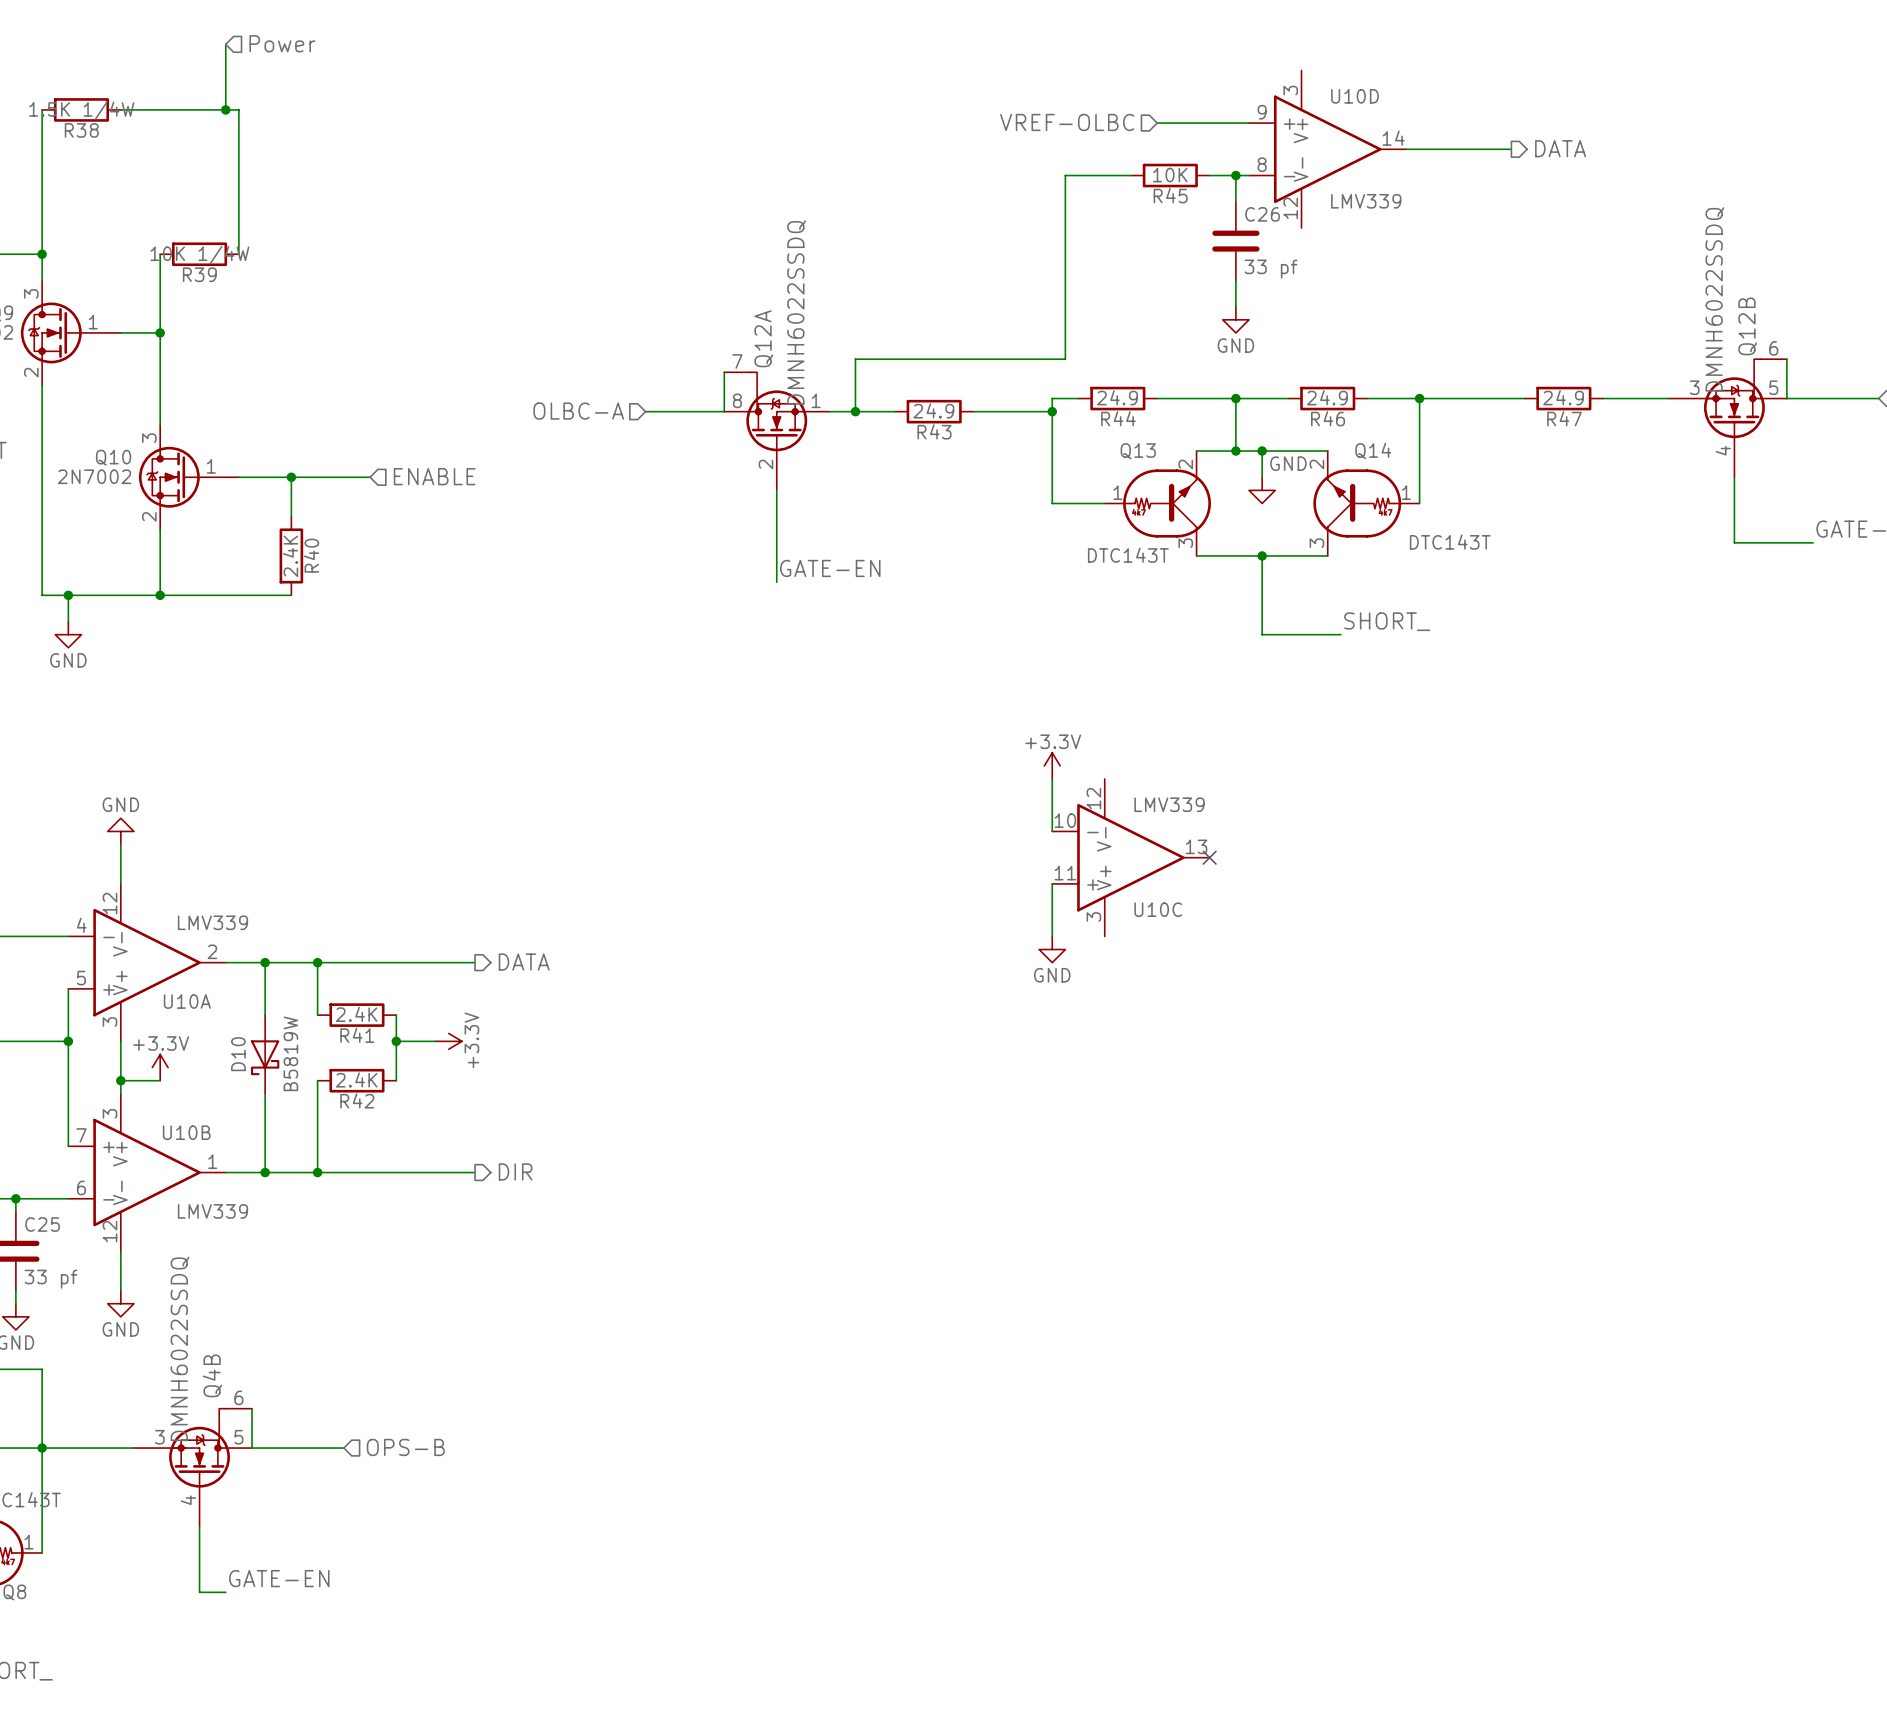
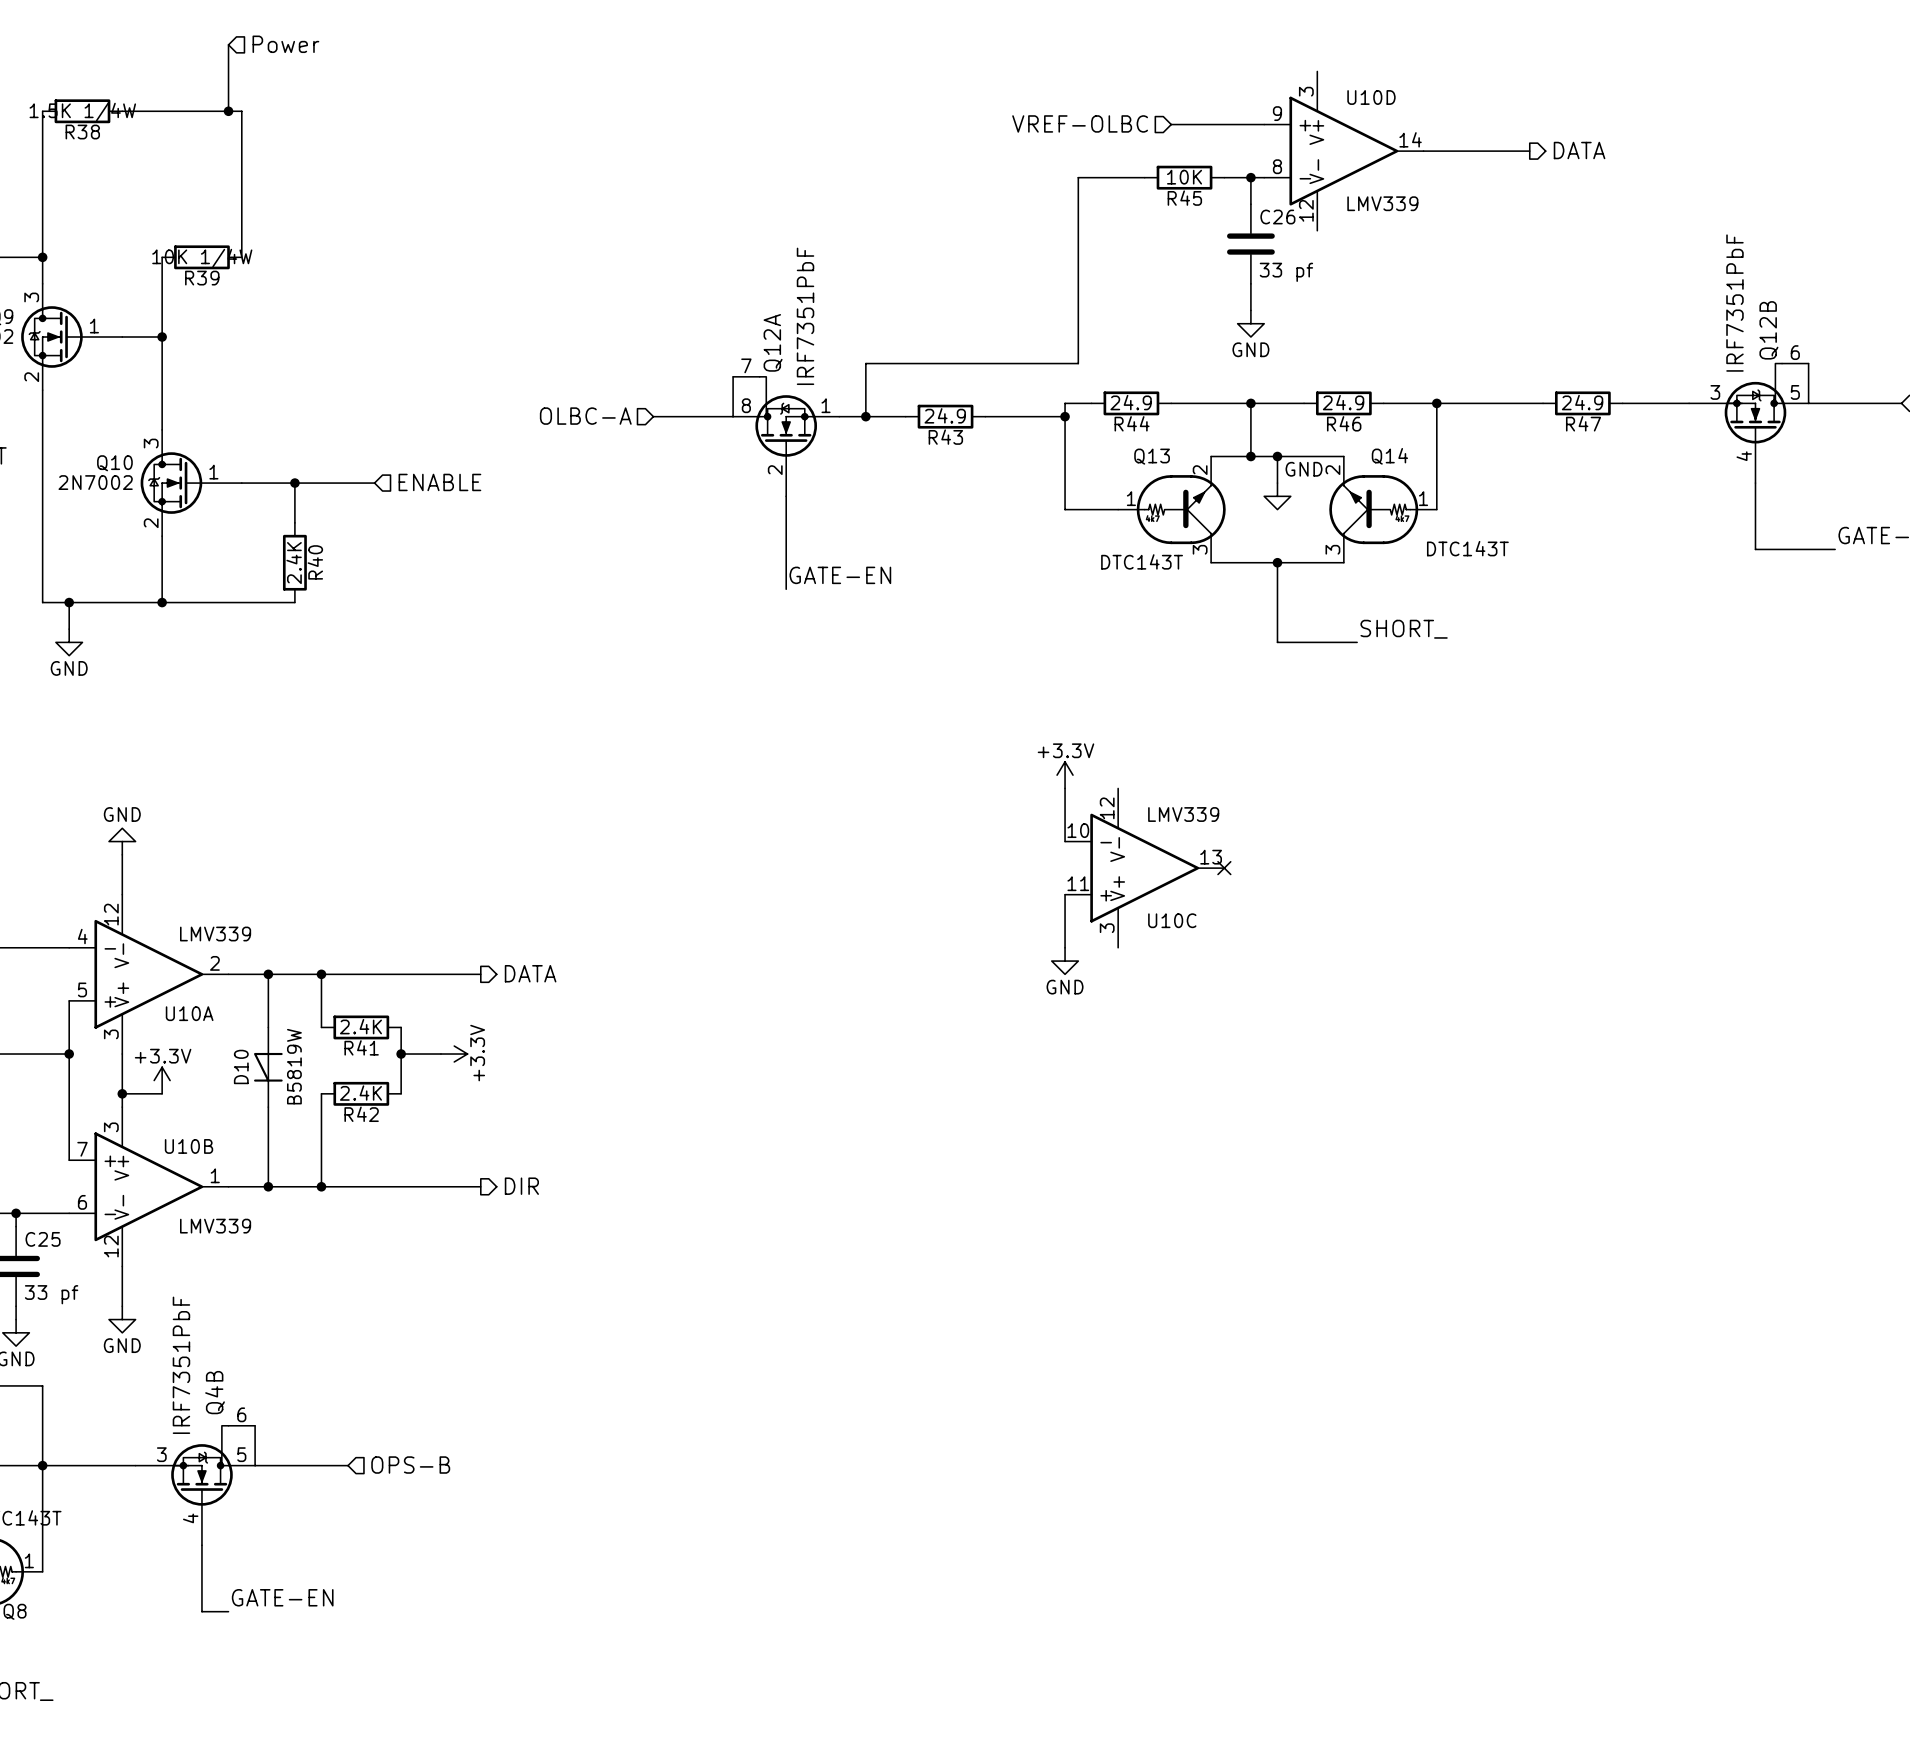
Q12B value: DMNH6022SSDQ (1714, 299) -> IRF7351PbF (1734, 303)
Q12A value: DMNH6022SSDQ (796, 312) -> IRF7351PbF (805, 316)
D10 symbol: [250, 1015, 280, 1094] -> [254, 1027, 283, 1108]
Q4B value: DMNH6022SSDQ (180, 1348) -> IRF7351PbF (181, 1365)

